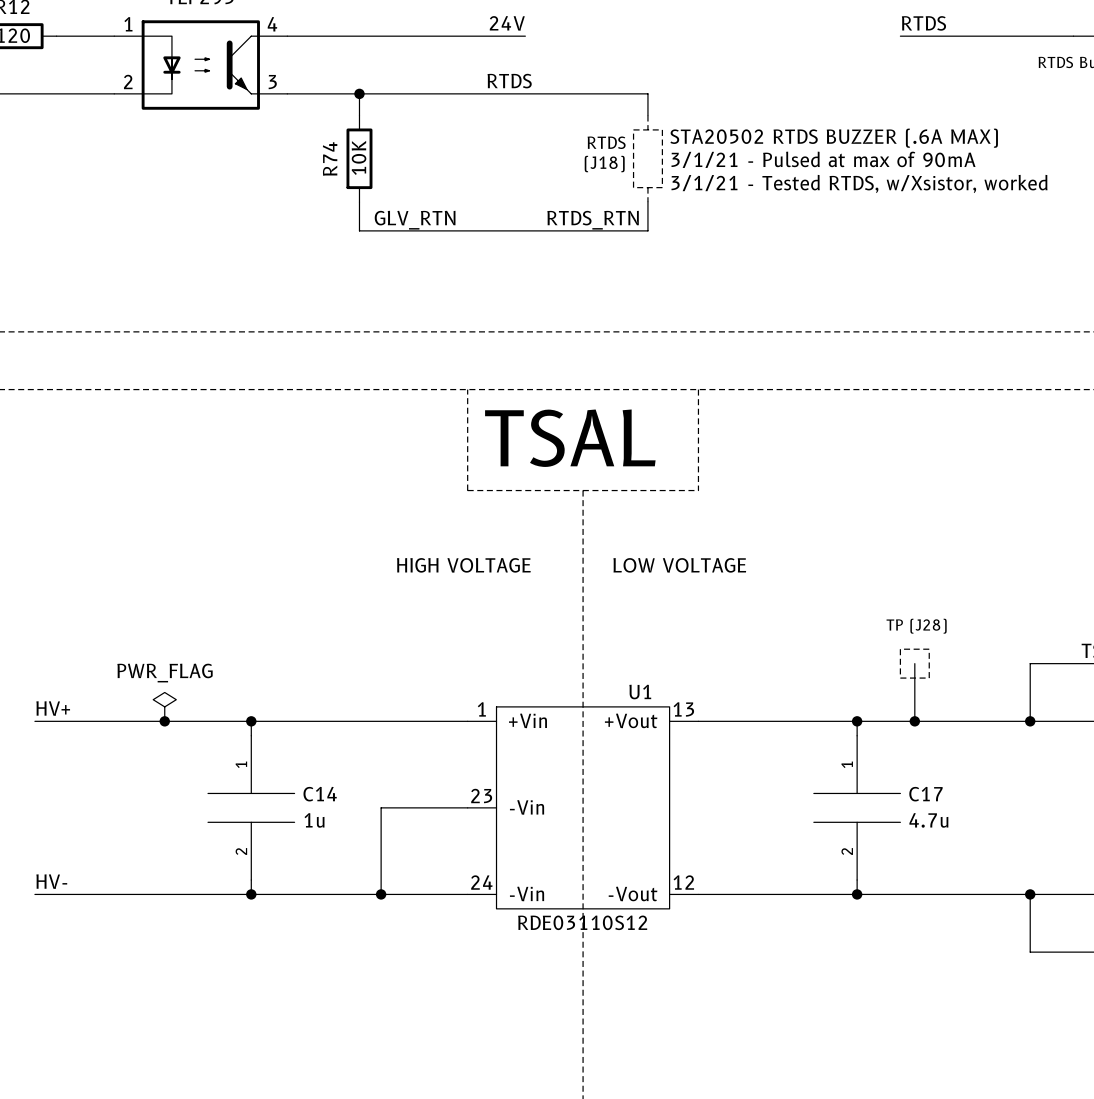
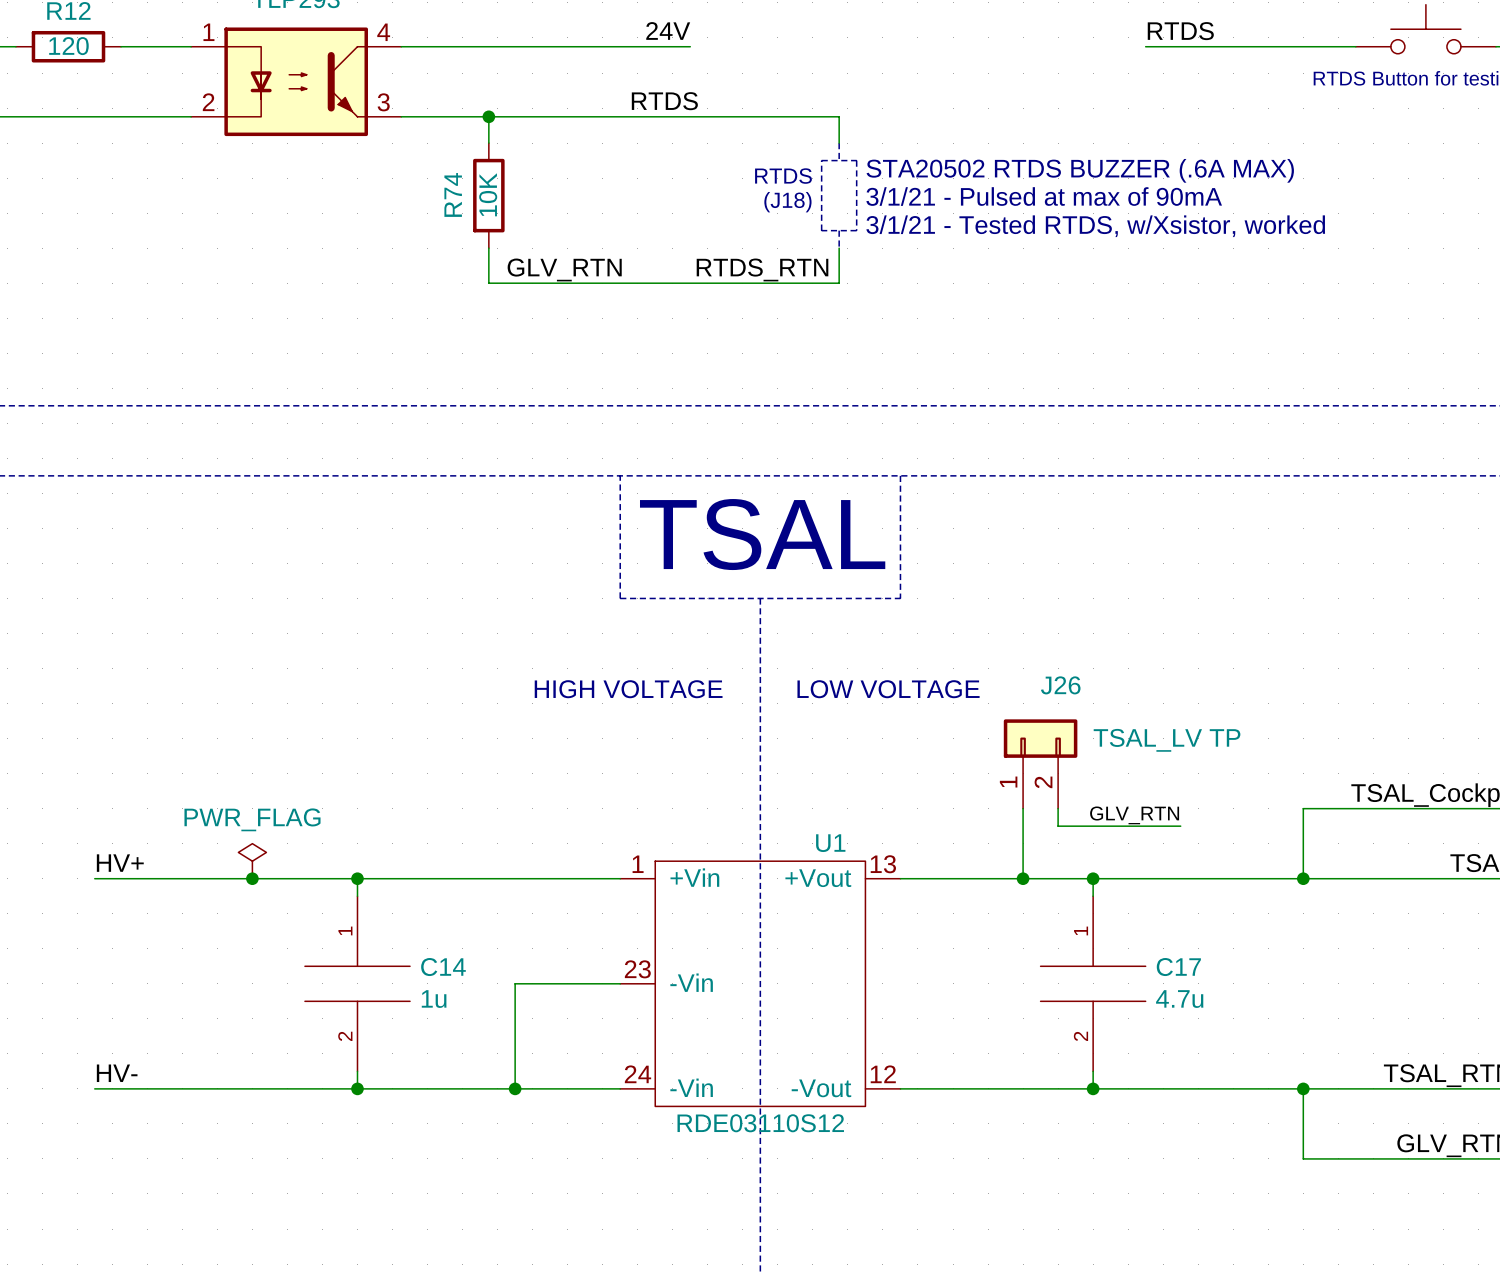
J26: none -> TSAL_LV TP (1040, 763)
text: TP (J28) (916, 626) -> none
line: (900, 649) (900, 678) (929, 678) (929, 649) (900, 649) -> none
wire: none -> (1058, 808) (1058, 826) (1180, 826)
wire: (914, 663) (914, 721) -> (1023, 808) (1023, 878)
label: none -> GLV_RTN (1134, 815)
junction: none -> (1023, 878)
junction: (914, 721) -> none

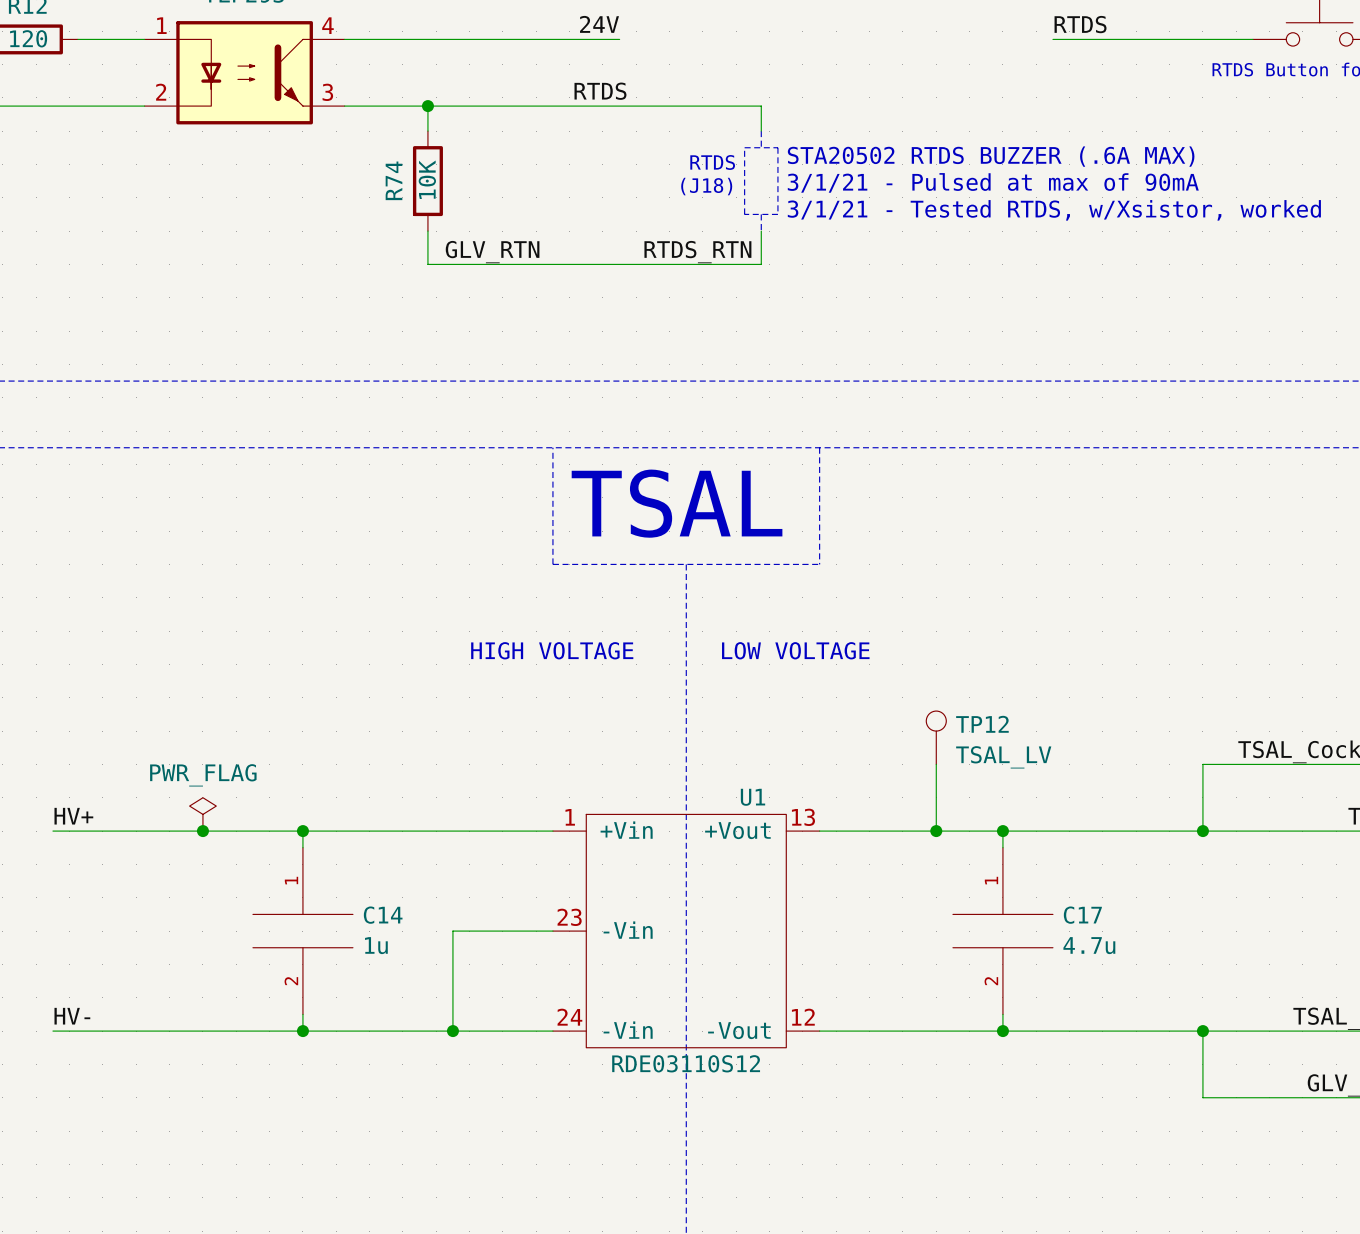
J26: TSAL_LV TP (1040, 763) -> none
TP12: none -> TSAL_LV (936, 737)
wire: (1058, 808) (1058, 826) (1180, 826) -> none
label: GLV_RTN (1134, 815) -> none

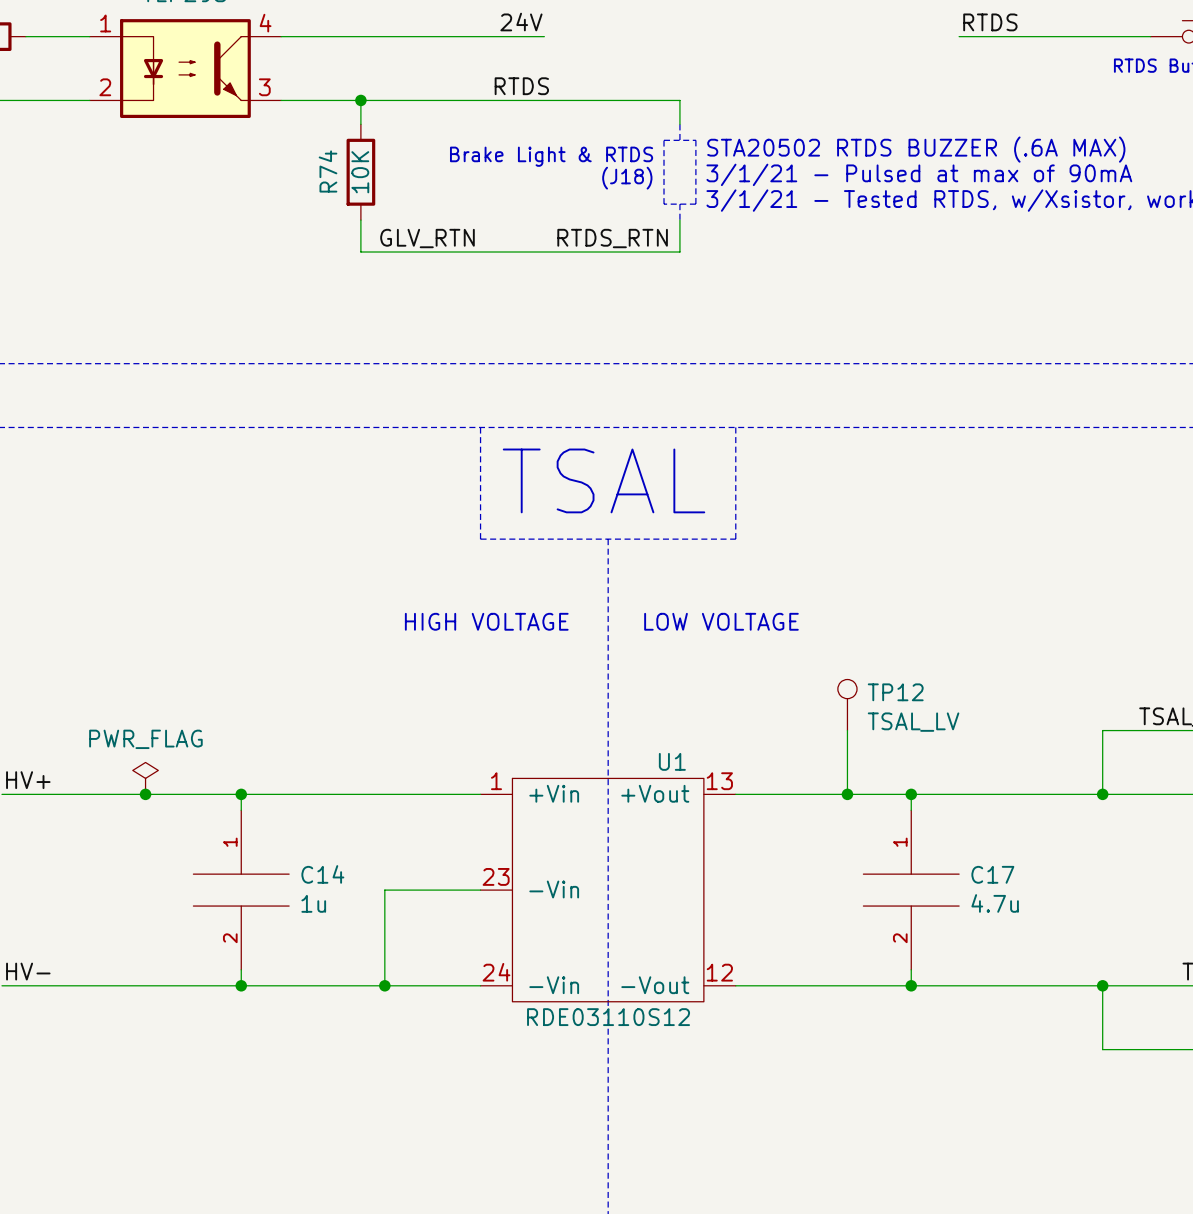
text: RTDS (712, 162) -> Brake Light & RTDS (551, 156)

